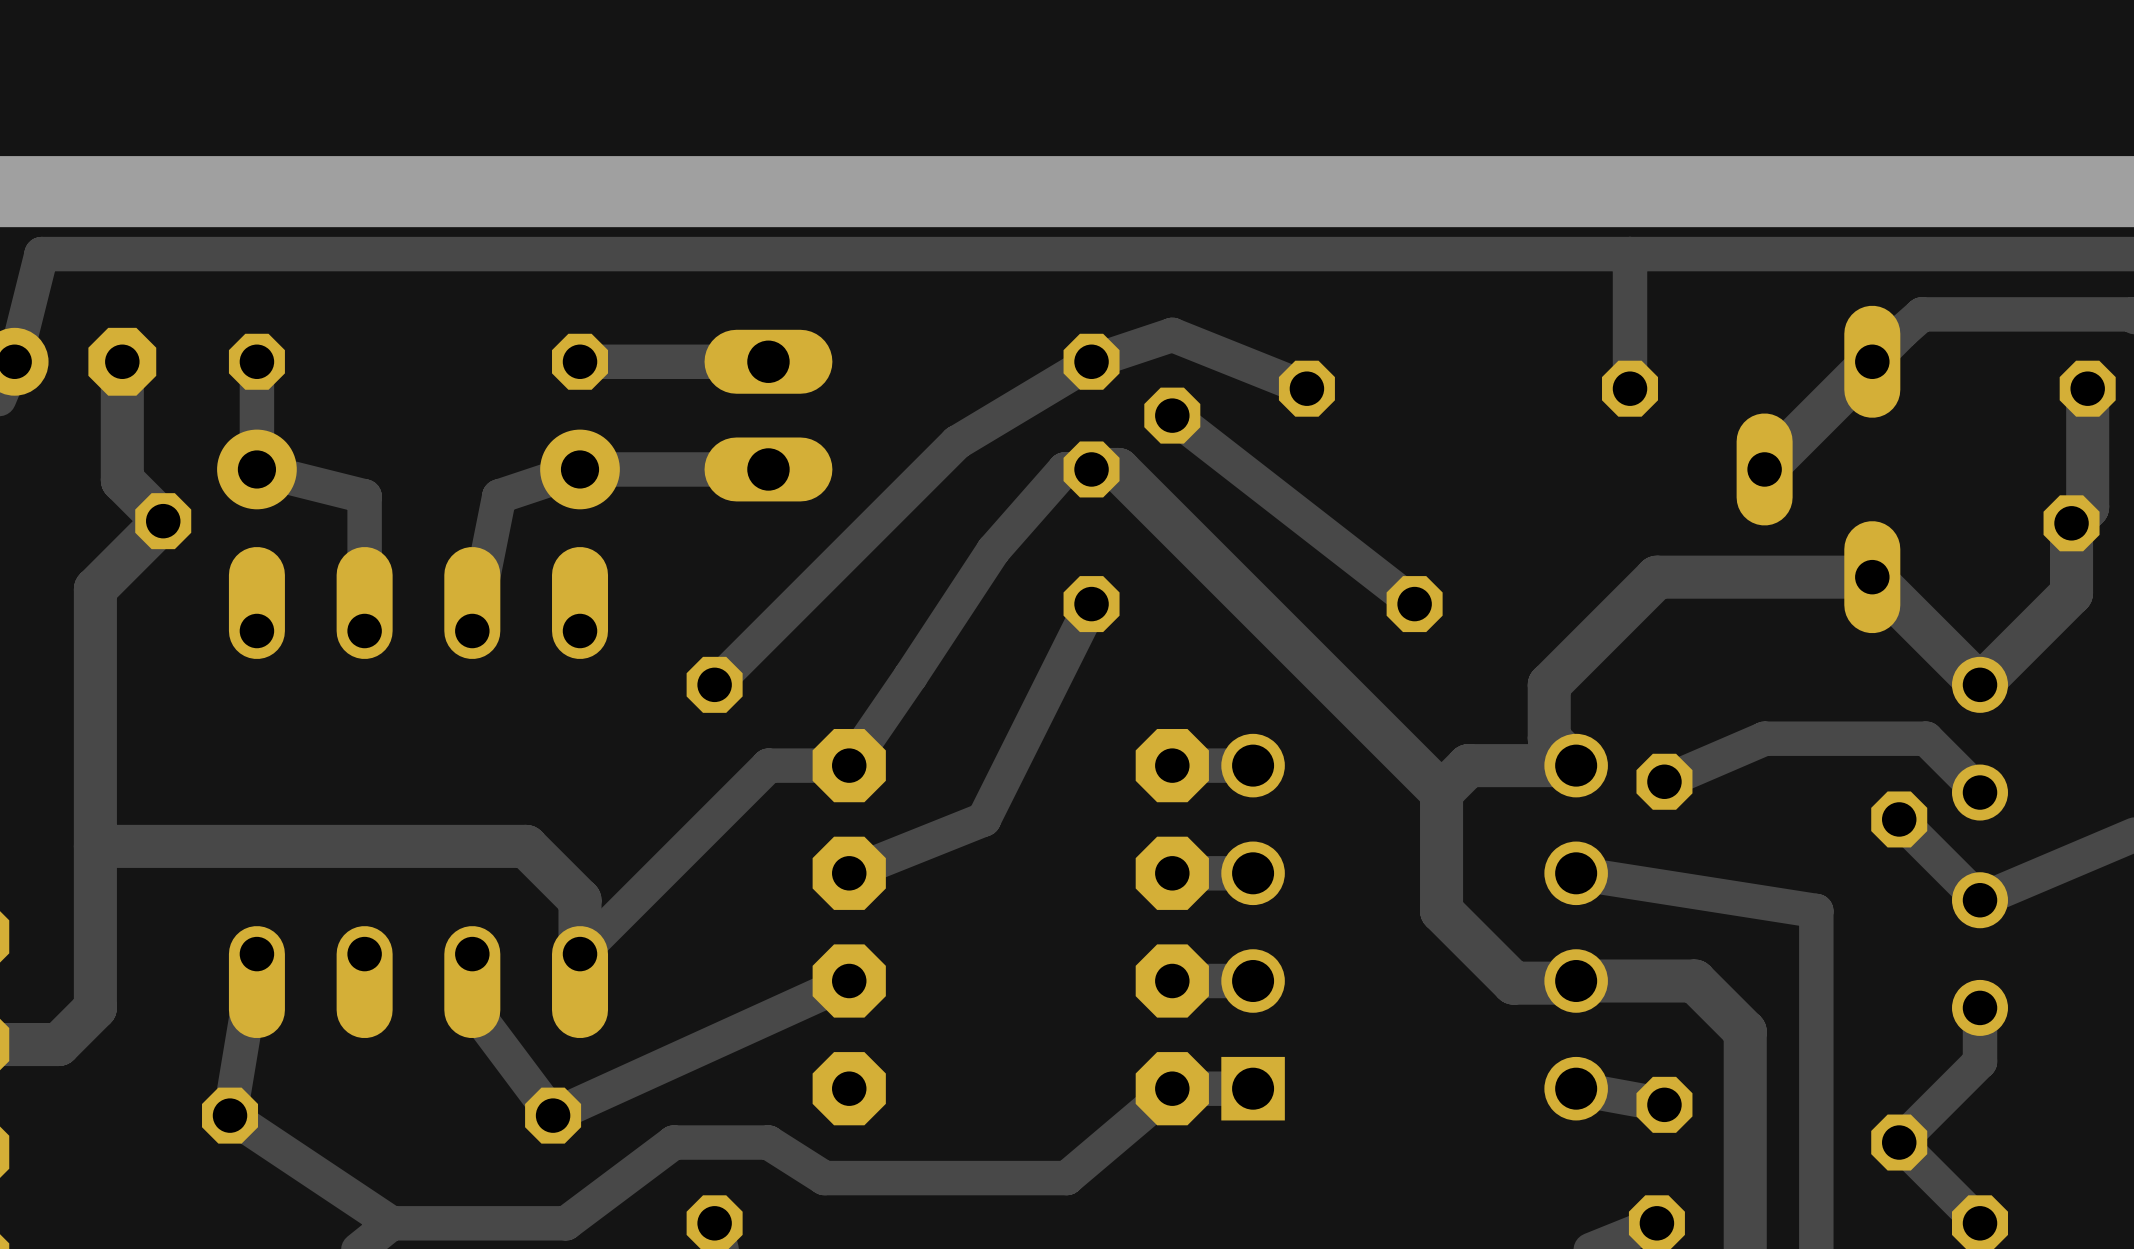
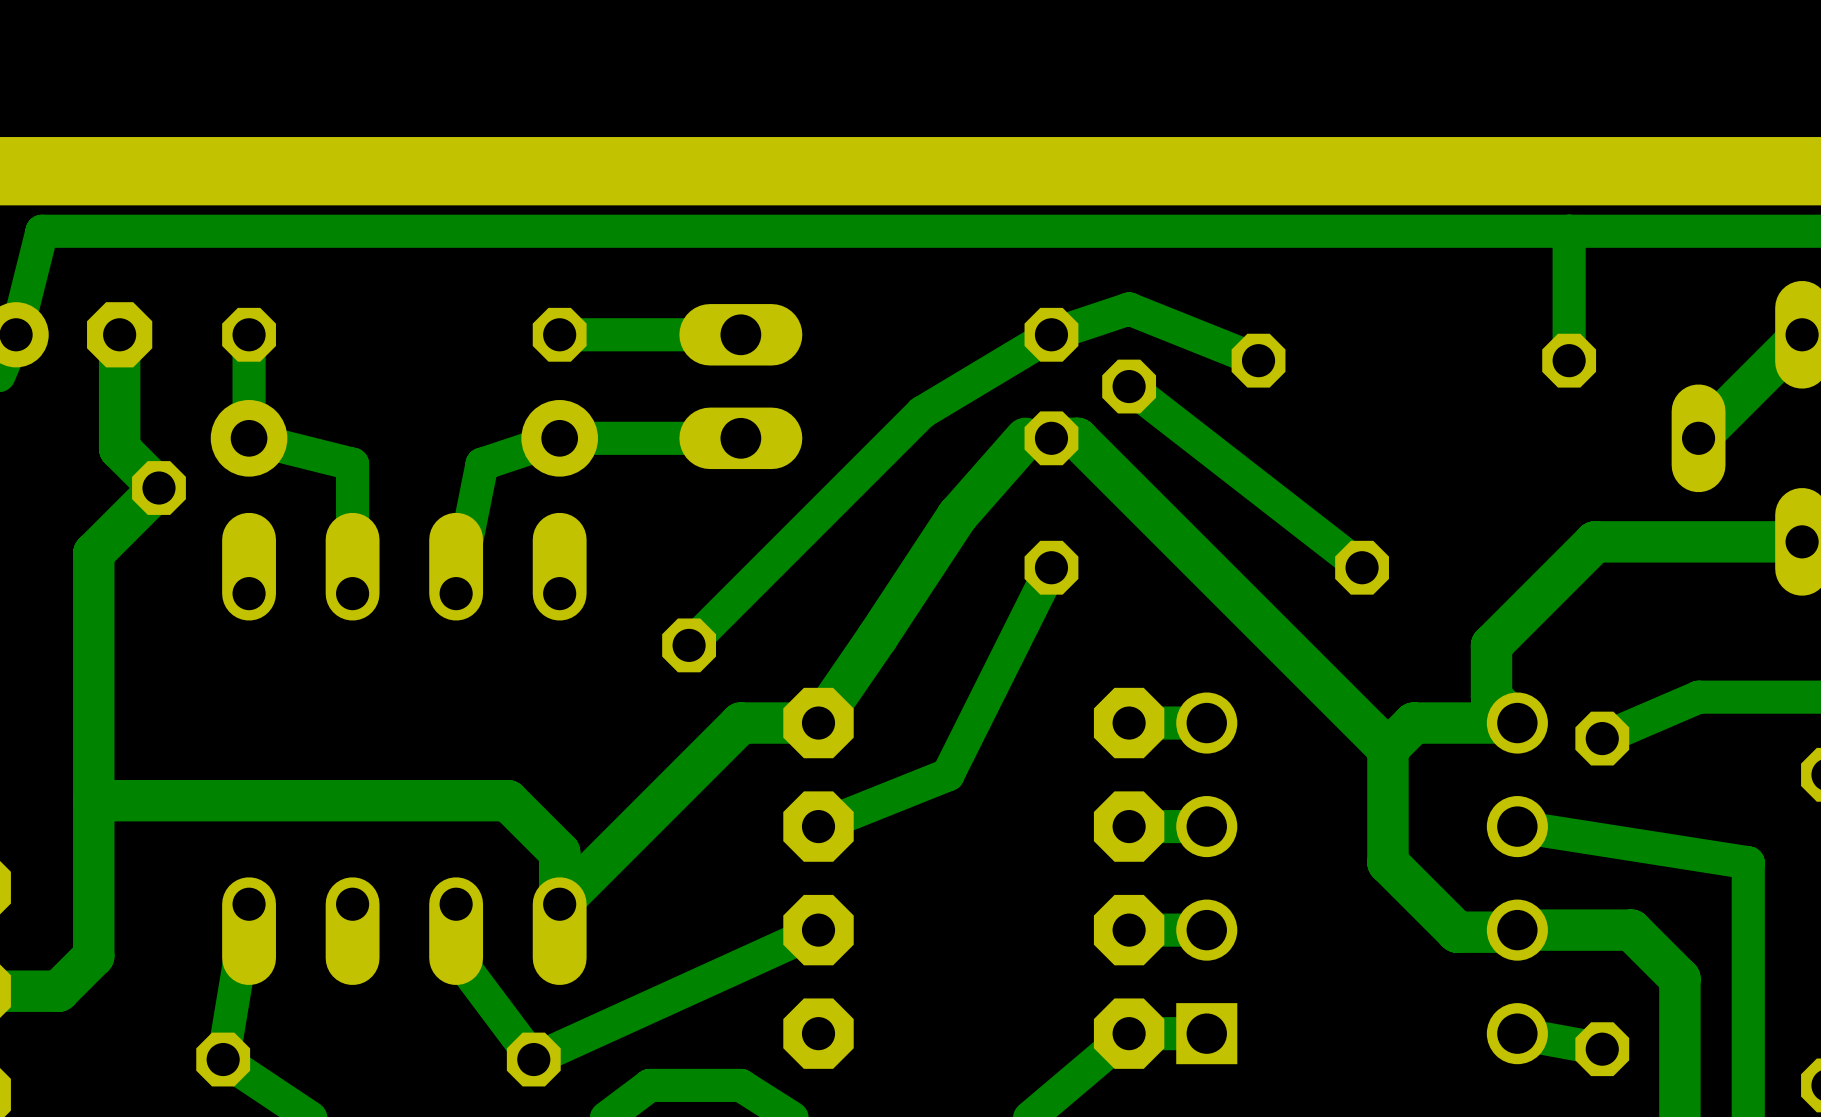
track width: thin (1064, 469) (993, 550) (849, 765) (768, 765) (580, 954) -> thick (1025, 438) (957, 515) (818, 723) (740, 723) (559, 904)

